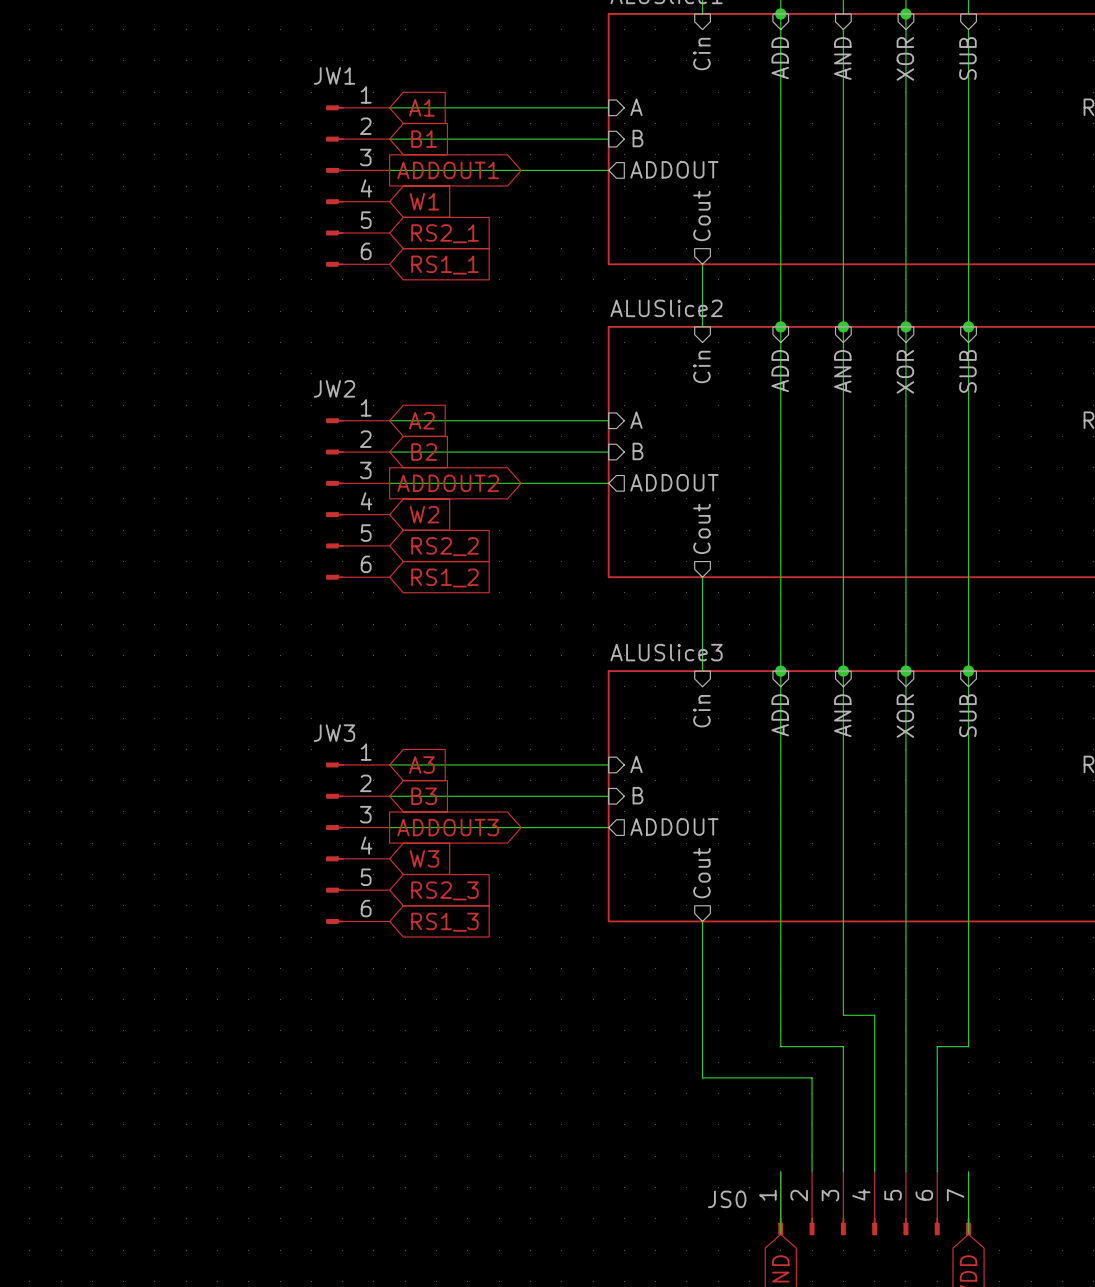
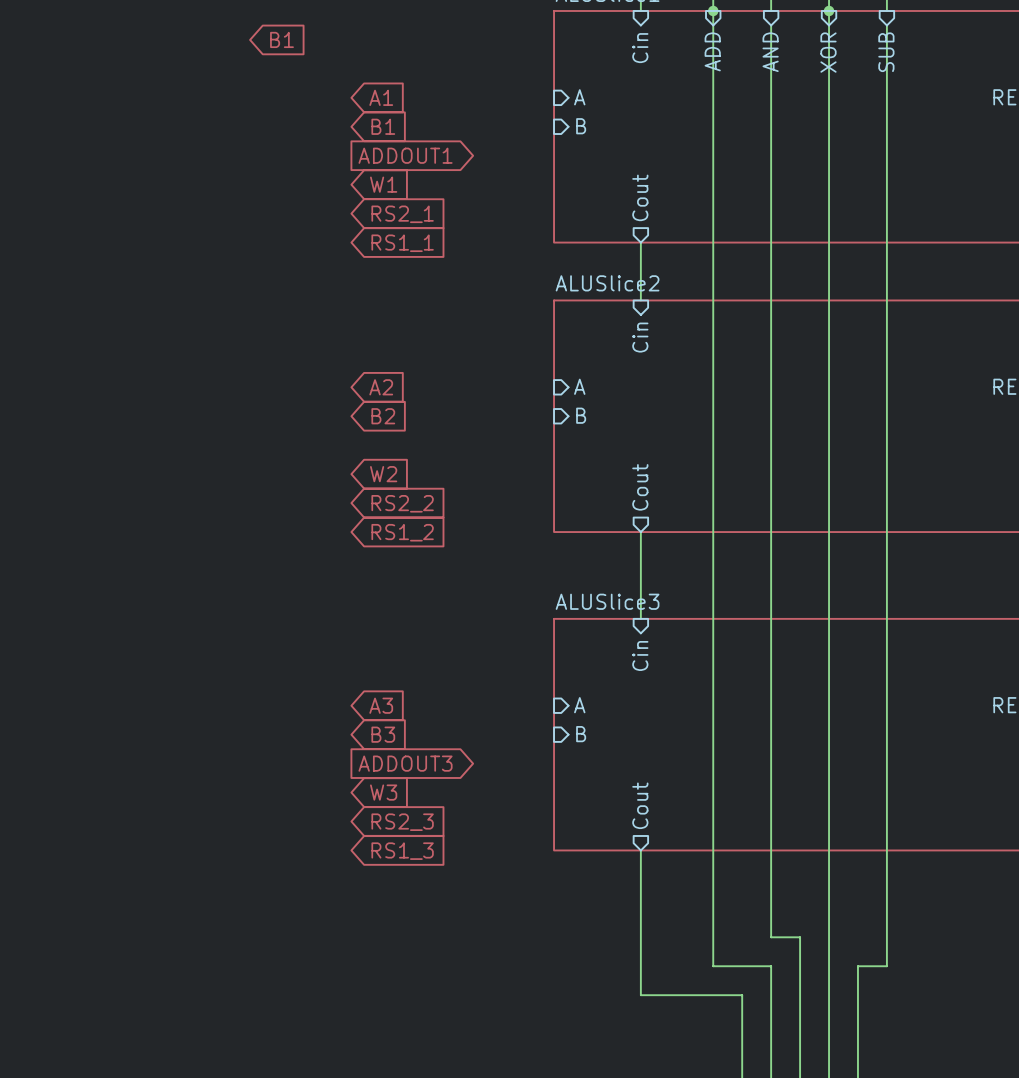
global label: none -> B1 (281, 39)
wire: (389, 107) (608, 107) -> none
wire: (389, 139) (608, 139) -> none
sheet pin: ADDOUT (674, 169) -> none
wire: (389, 170) (608, 170) -> none
JW1: (357, 186) -> none
junction: (780, 326) -> none
junction: (843, 326) -> none
junction: (905, 326) -> none
junction: (968, 326) -> none
sheet pin: ADD (780, 371) -> none
sheet pin: AND (842, 371) -> none
sheet pin: XOR (905, 371) -> none
sheet pin: SUB (967, 371) -> none
wire: (389, 420) (608, 420) -> none
wire: (389, 452) (608, 452) -> none
sheet pin: ADDOUT (674, 482) -> none
wire: (389, 483) (608, 483) -> none
global label: ADDOUT2 (448, 483) -> none
JW2: (357, 498) -> none
junction: (780, 671) -> none
junction: (843, 671) -> none
junction: (905, 671) -> none
junction: (968, 671) -> none
sheet pin: ADD (780, 715) -> none
sheet pin: AND (842, 715) -> none
sheet pin: SUB (967, 715) -> none
sheet pin: XOR (905, 716) -> none
wire: (389, 764) (608, 764) -> none
wire: (389, 796) (608, 796) -> none
sheet pin: ADDOUT (674, 826) -> none
wire: (389, 827) (608, 827) -> none
JW3: (357, 843) -> none

